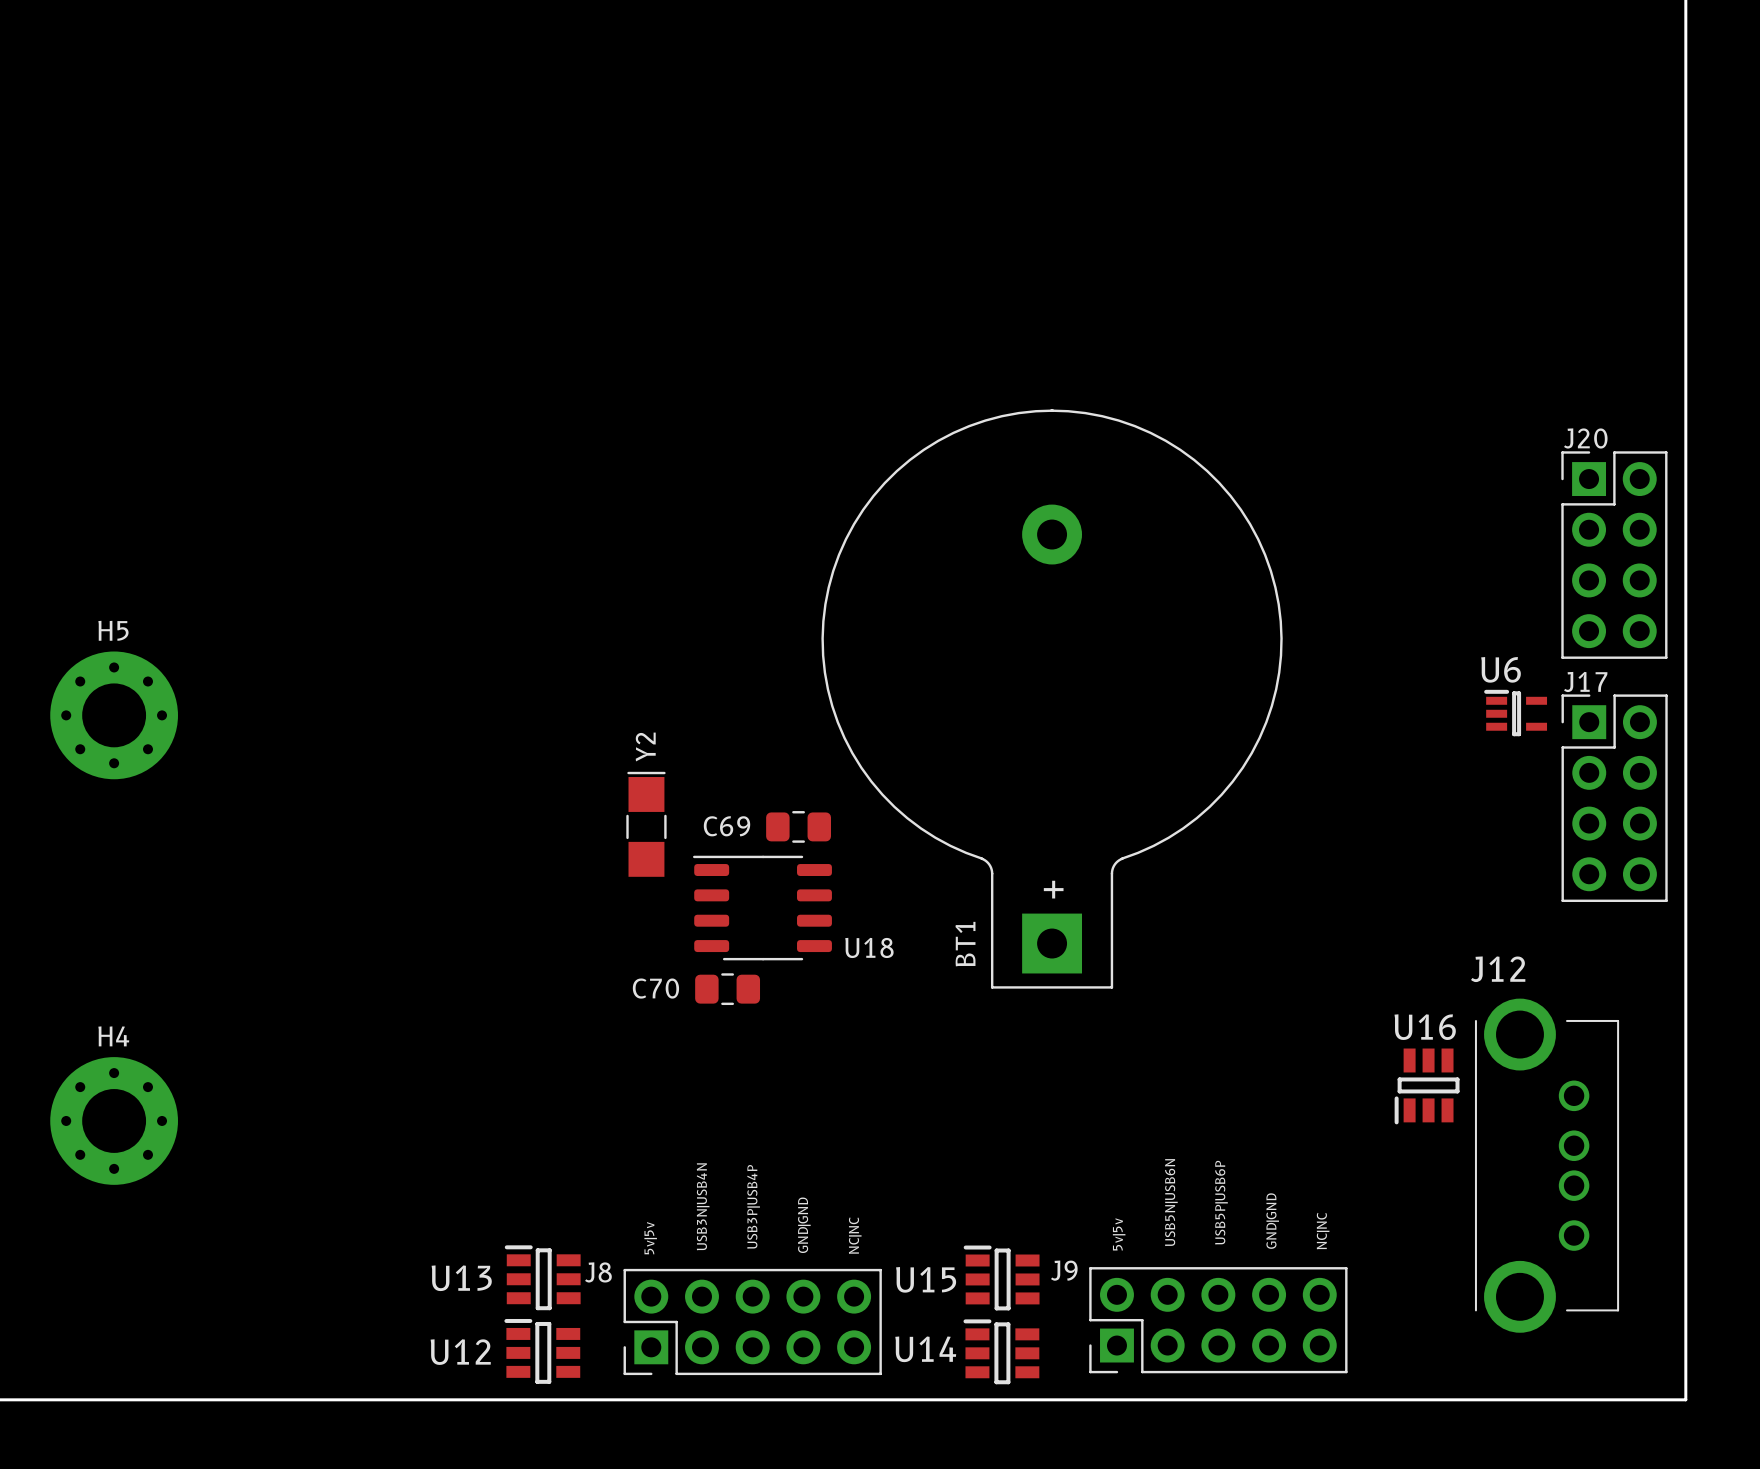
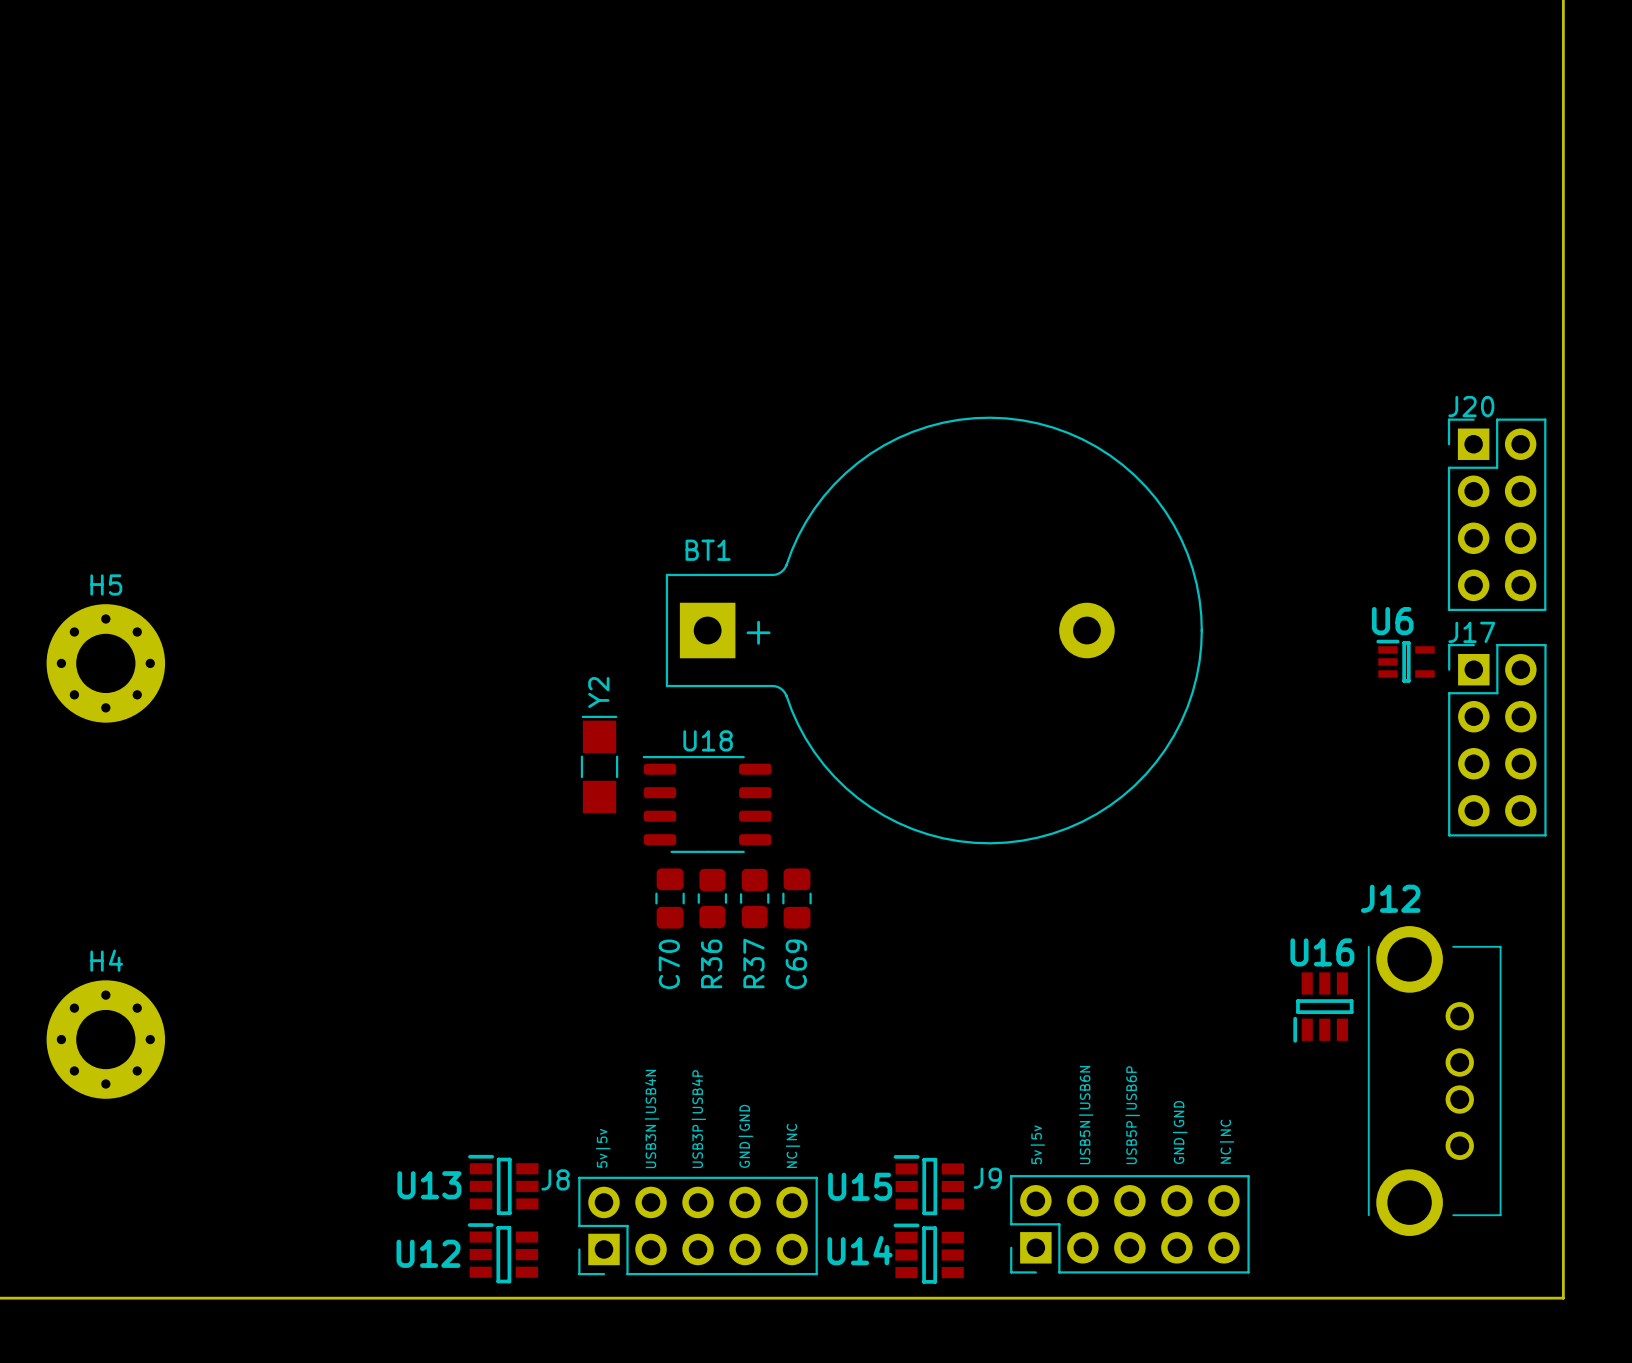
BT1 rotation: 0° (1052, 699) -> 90° clockwise (934, 630)
C69 name position: C69 (727, 826) -> C69 (796, 964)
C69 rotation: 0° (798, 826) -> 90° clockwise (796, 898)
C69 position: (798, 826) -> (796, 898)
U18 position: (762, 908) -> (707, 804)
U18 name position: U18 (869, 947) -> U18 (708, 740)
R36: none -> (712, 898)
R37: none -> (754, 898)
C70 name position: C70 (655, 988) -> C70 (669, 964)
C70 rotation: 0° (727, 989) -> 90° clockwise (670, 898)

